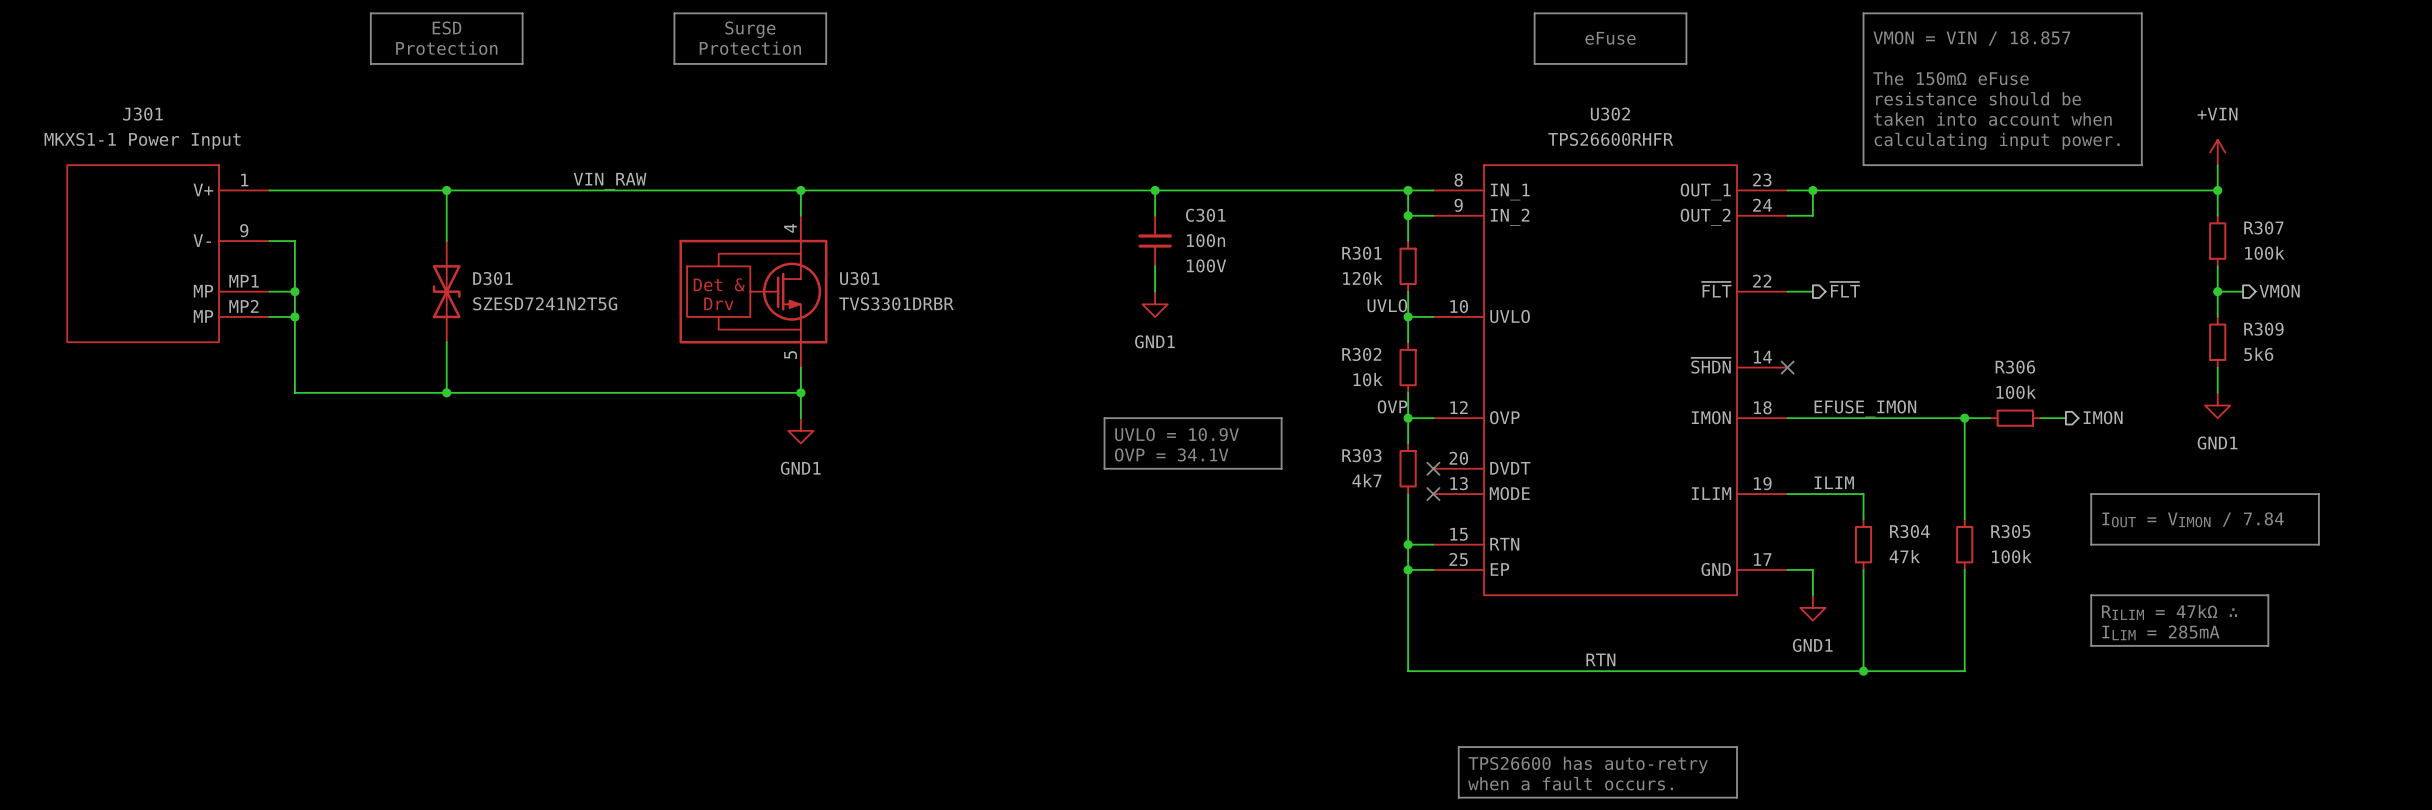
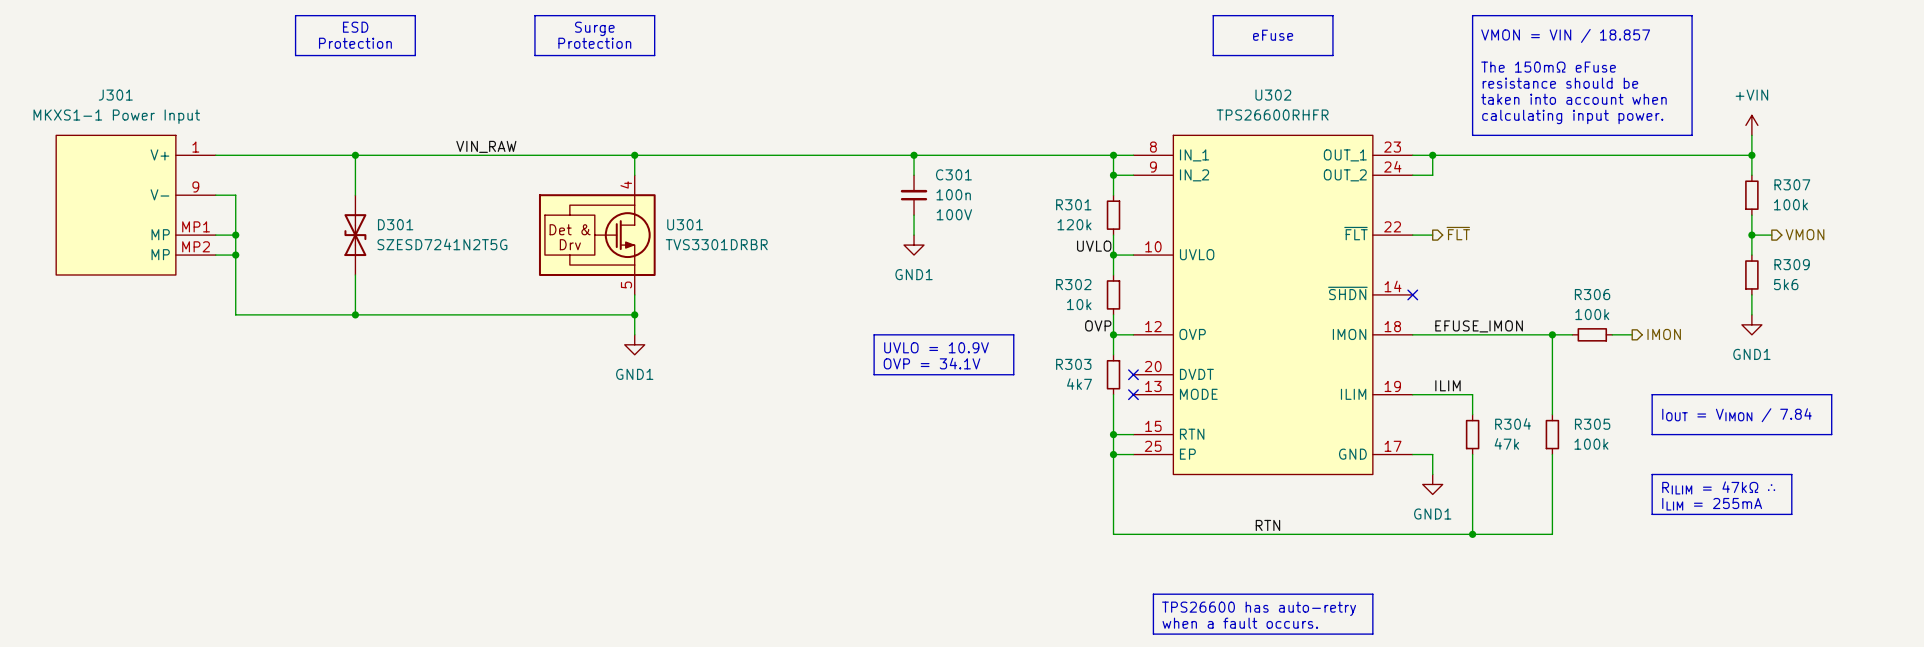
text: ILIM = 285mA (2160, 632) -> ILIM = 255mA (1712, 504)

